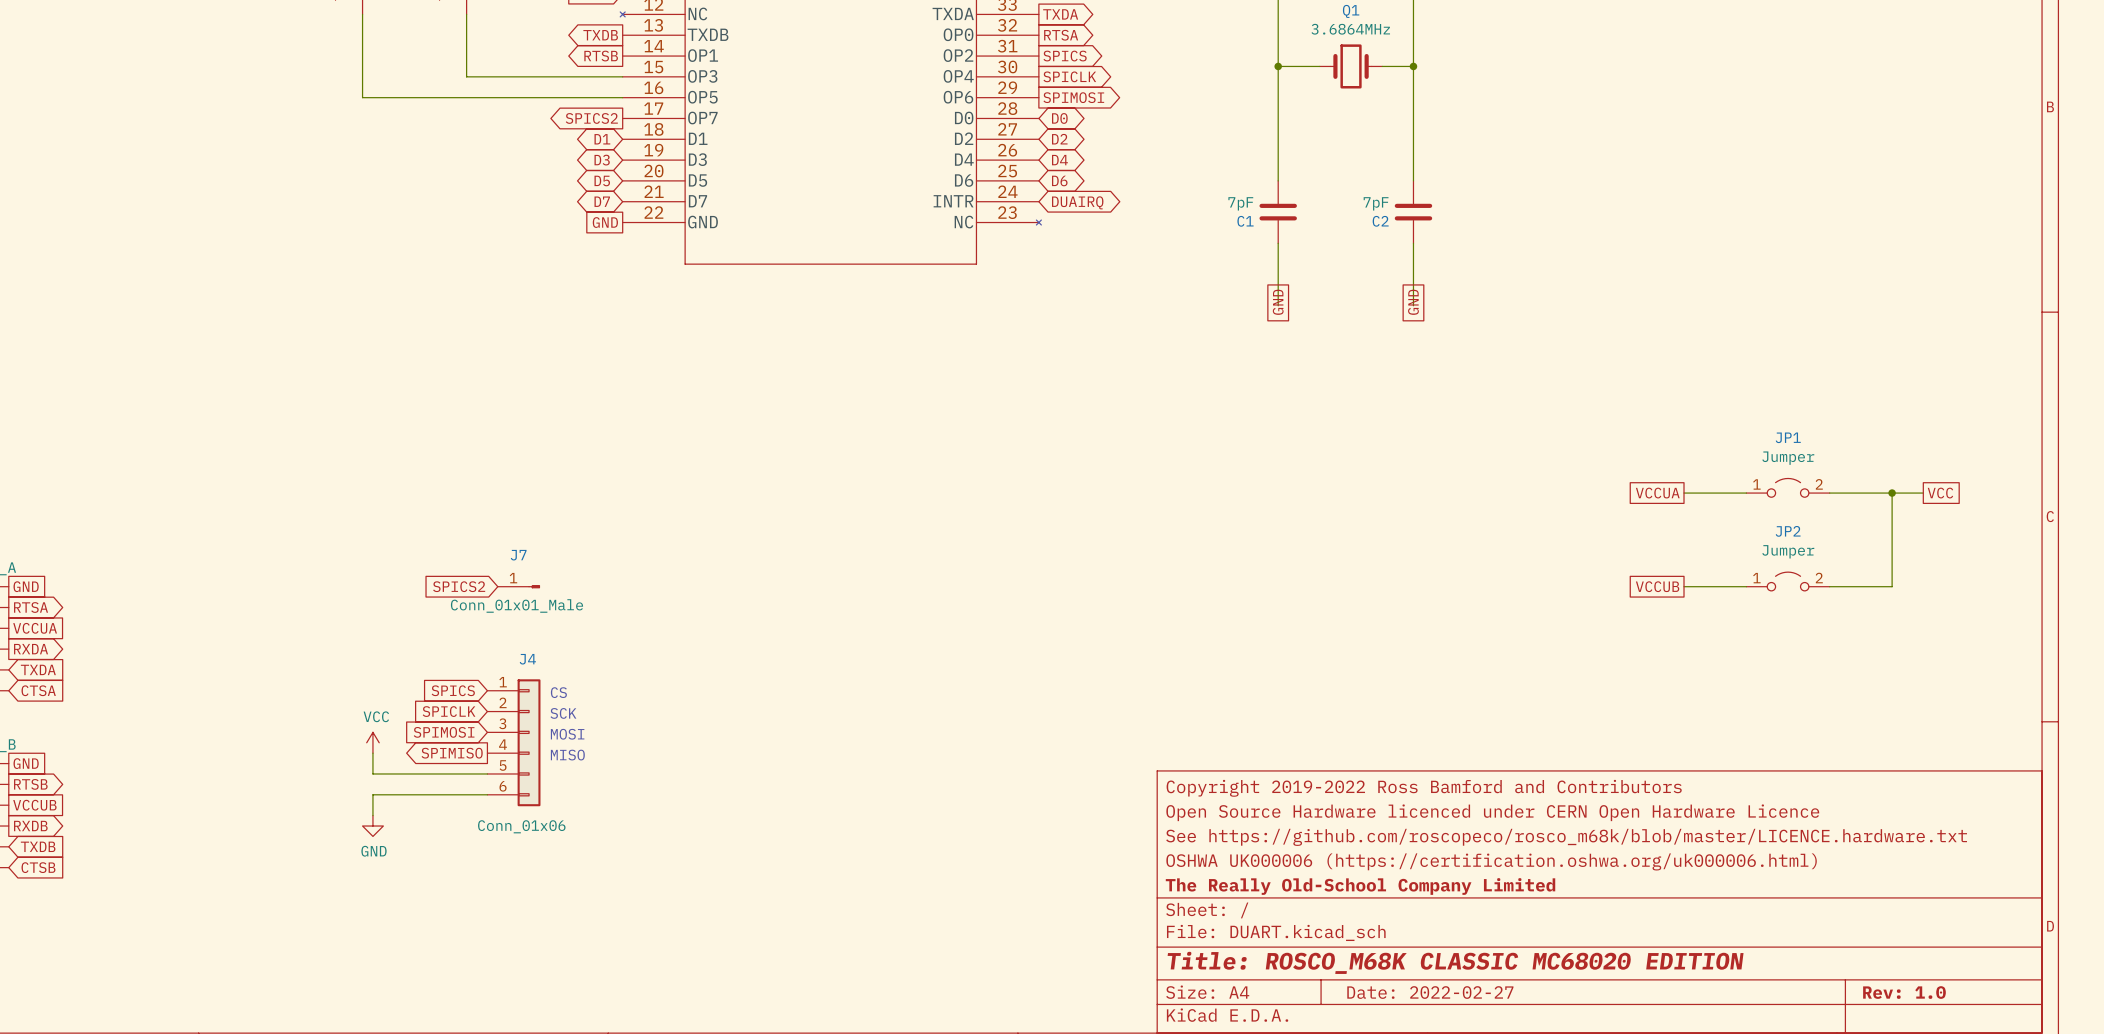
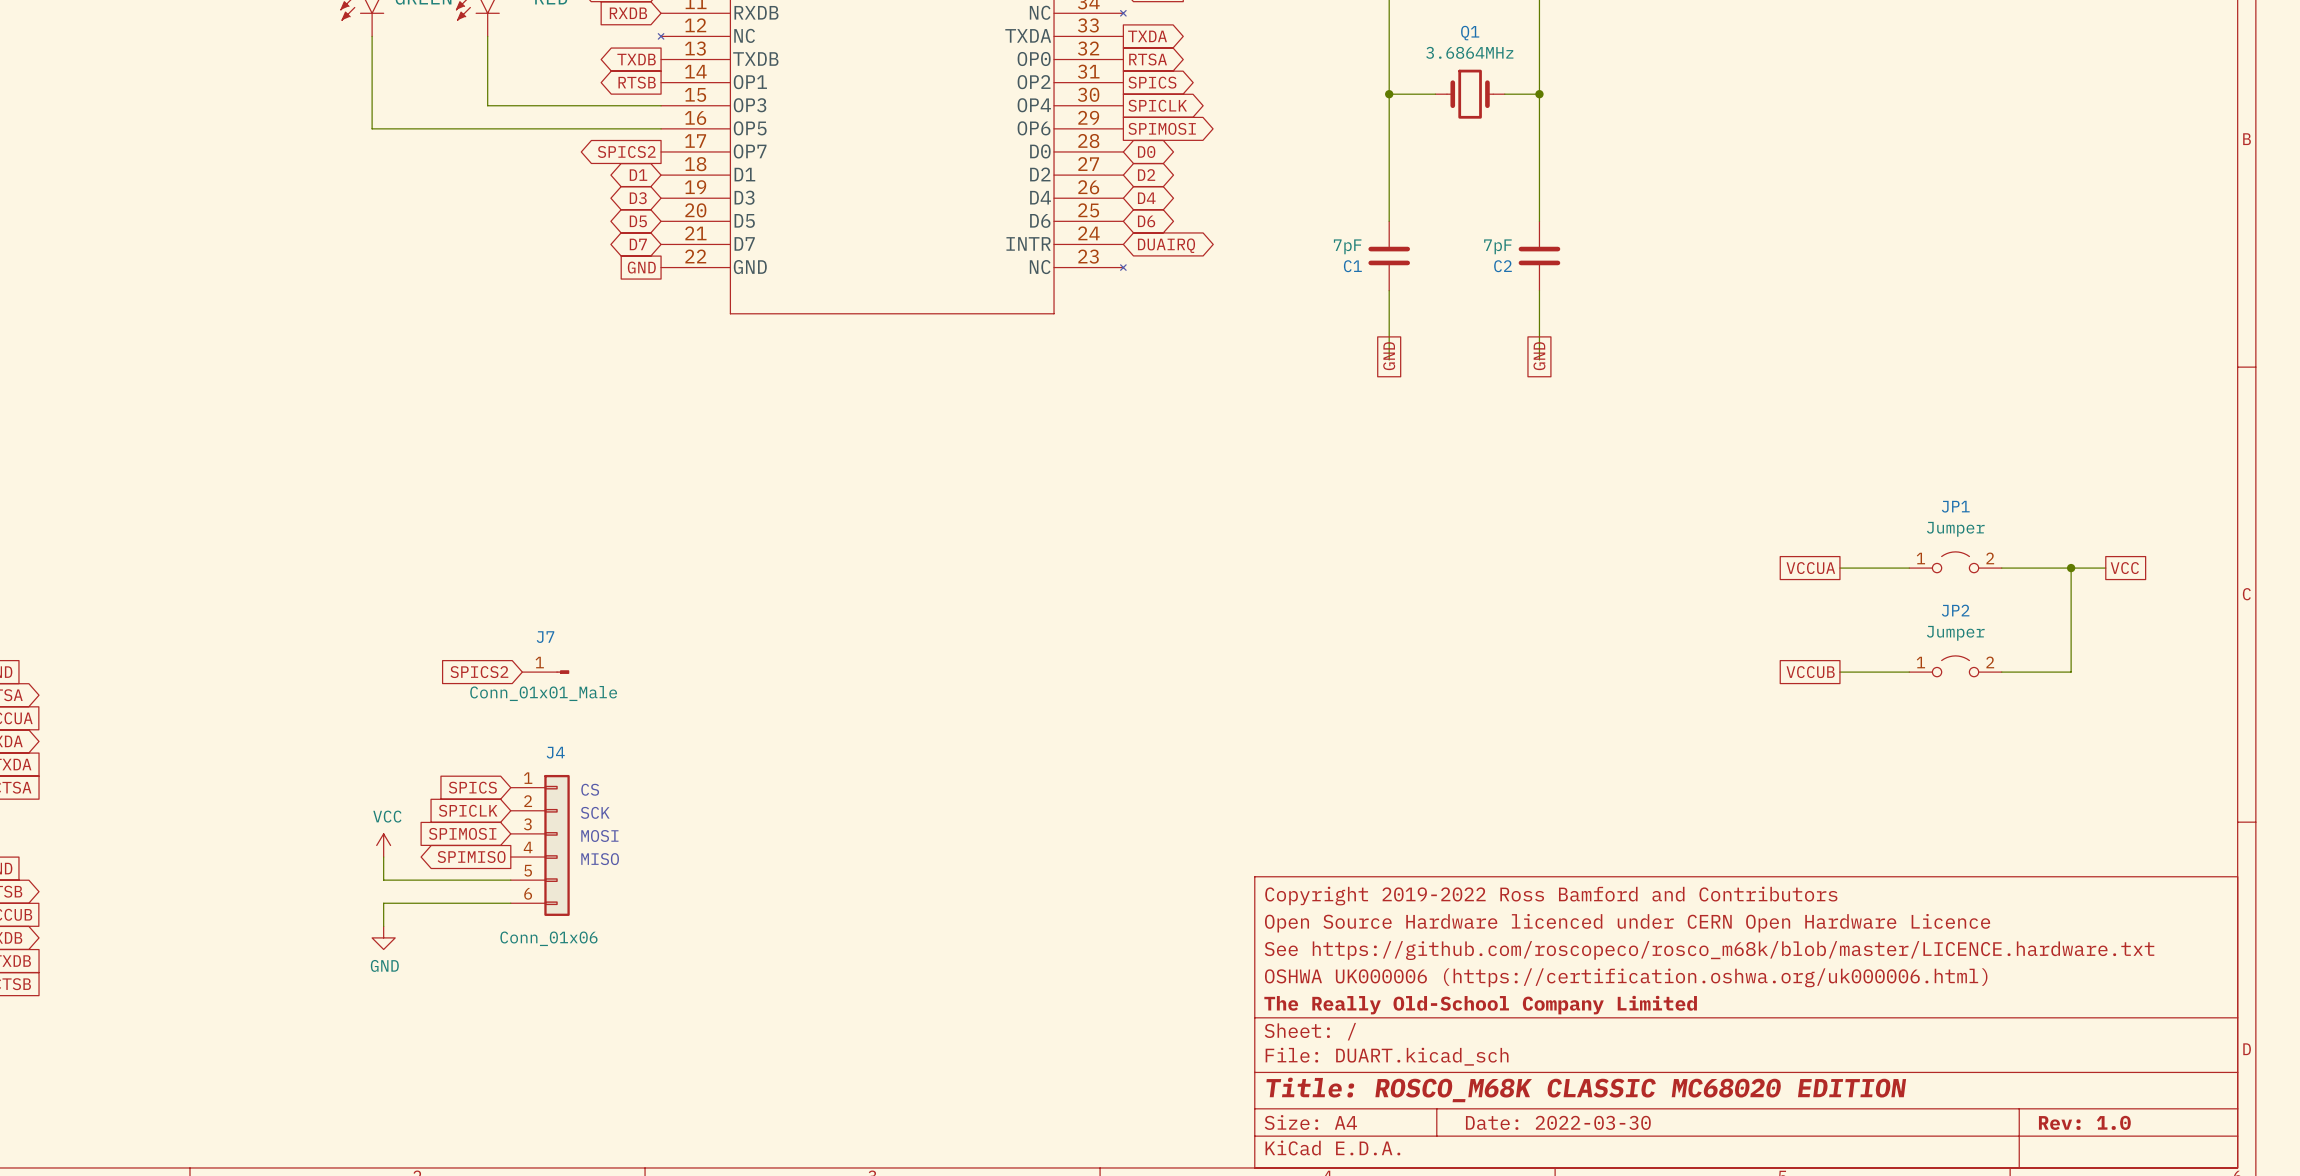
title block: Date: 2022-02-27 (1430, 992) -> Date: 2022-03-30 (1558, 1122)

